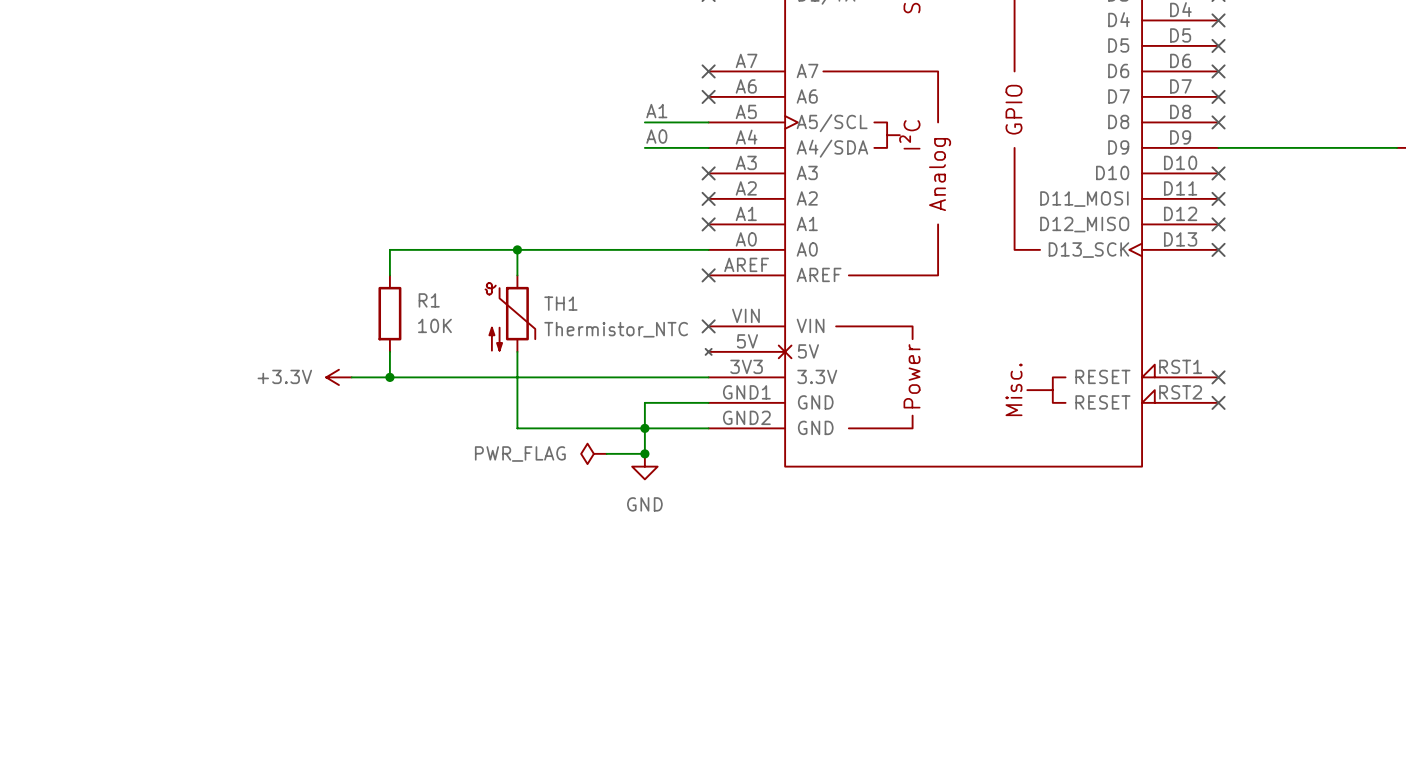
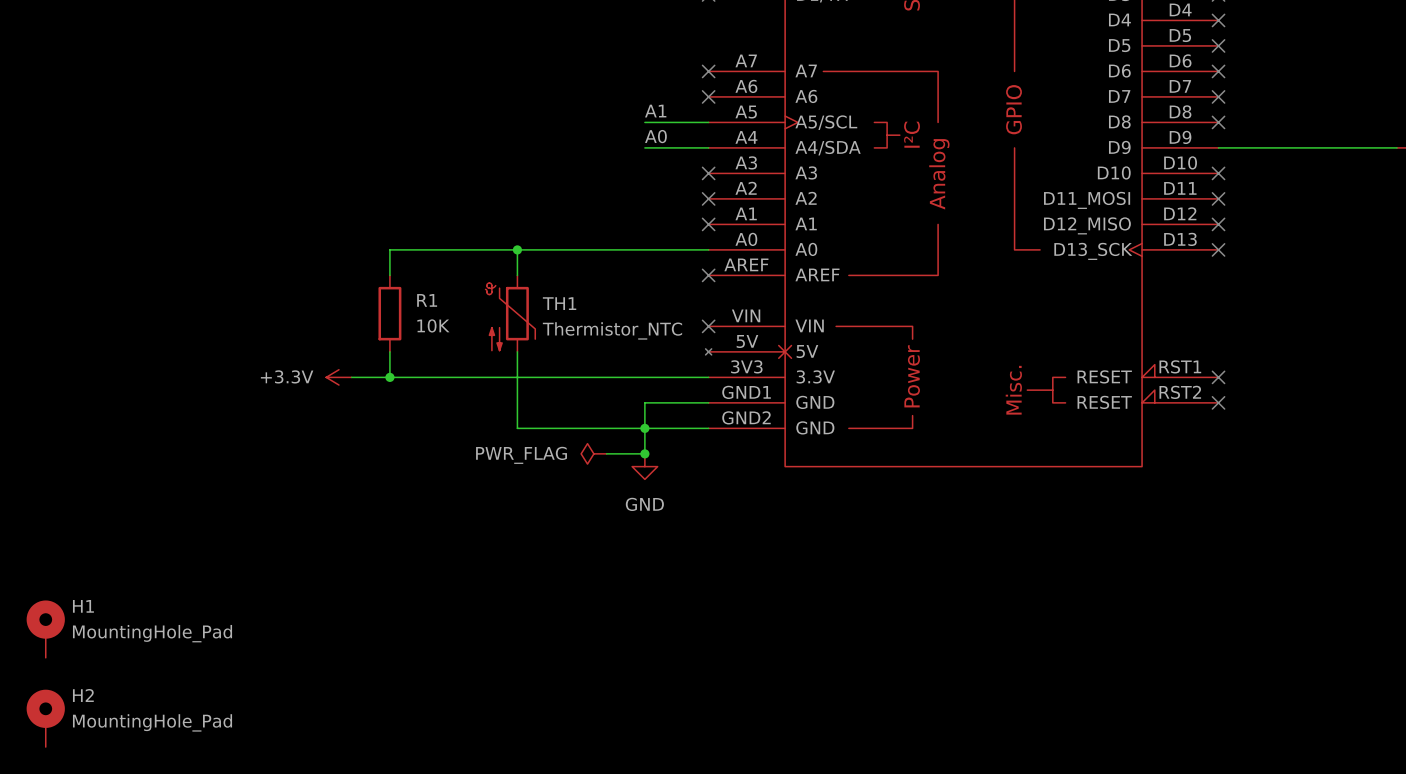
H1: none -> MountingHole_Pad (45, 629)
H2: none -> MountingHole_Pad (45, 718)

